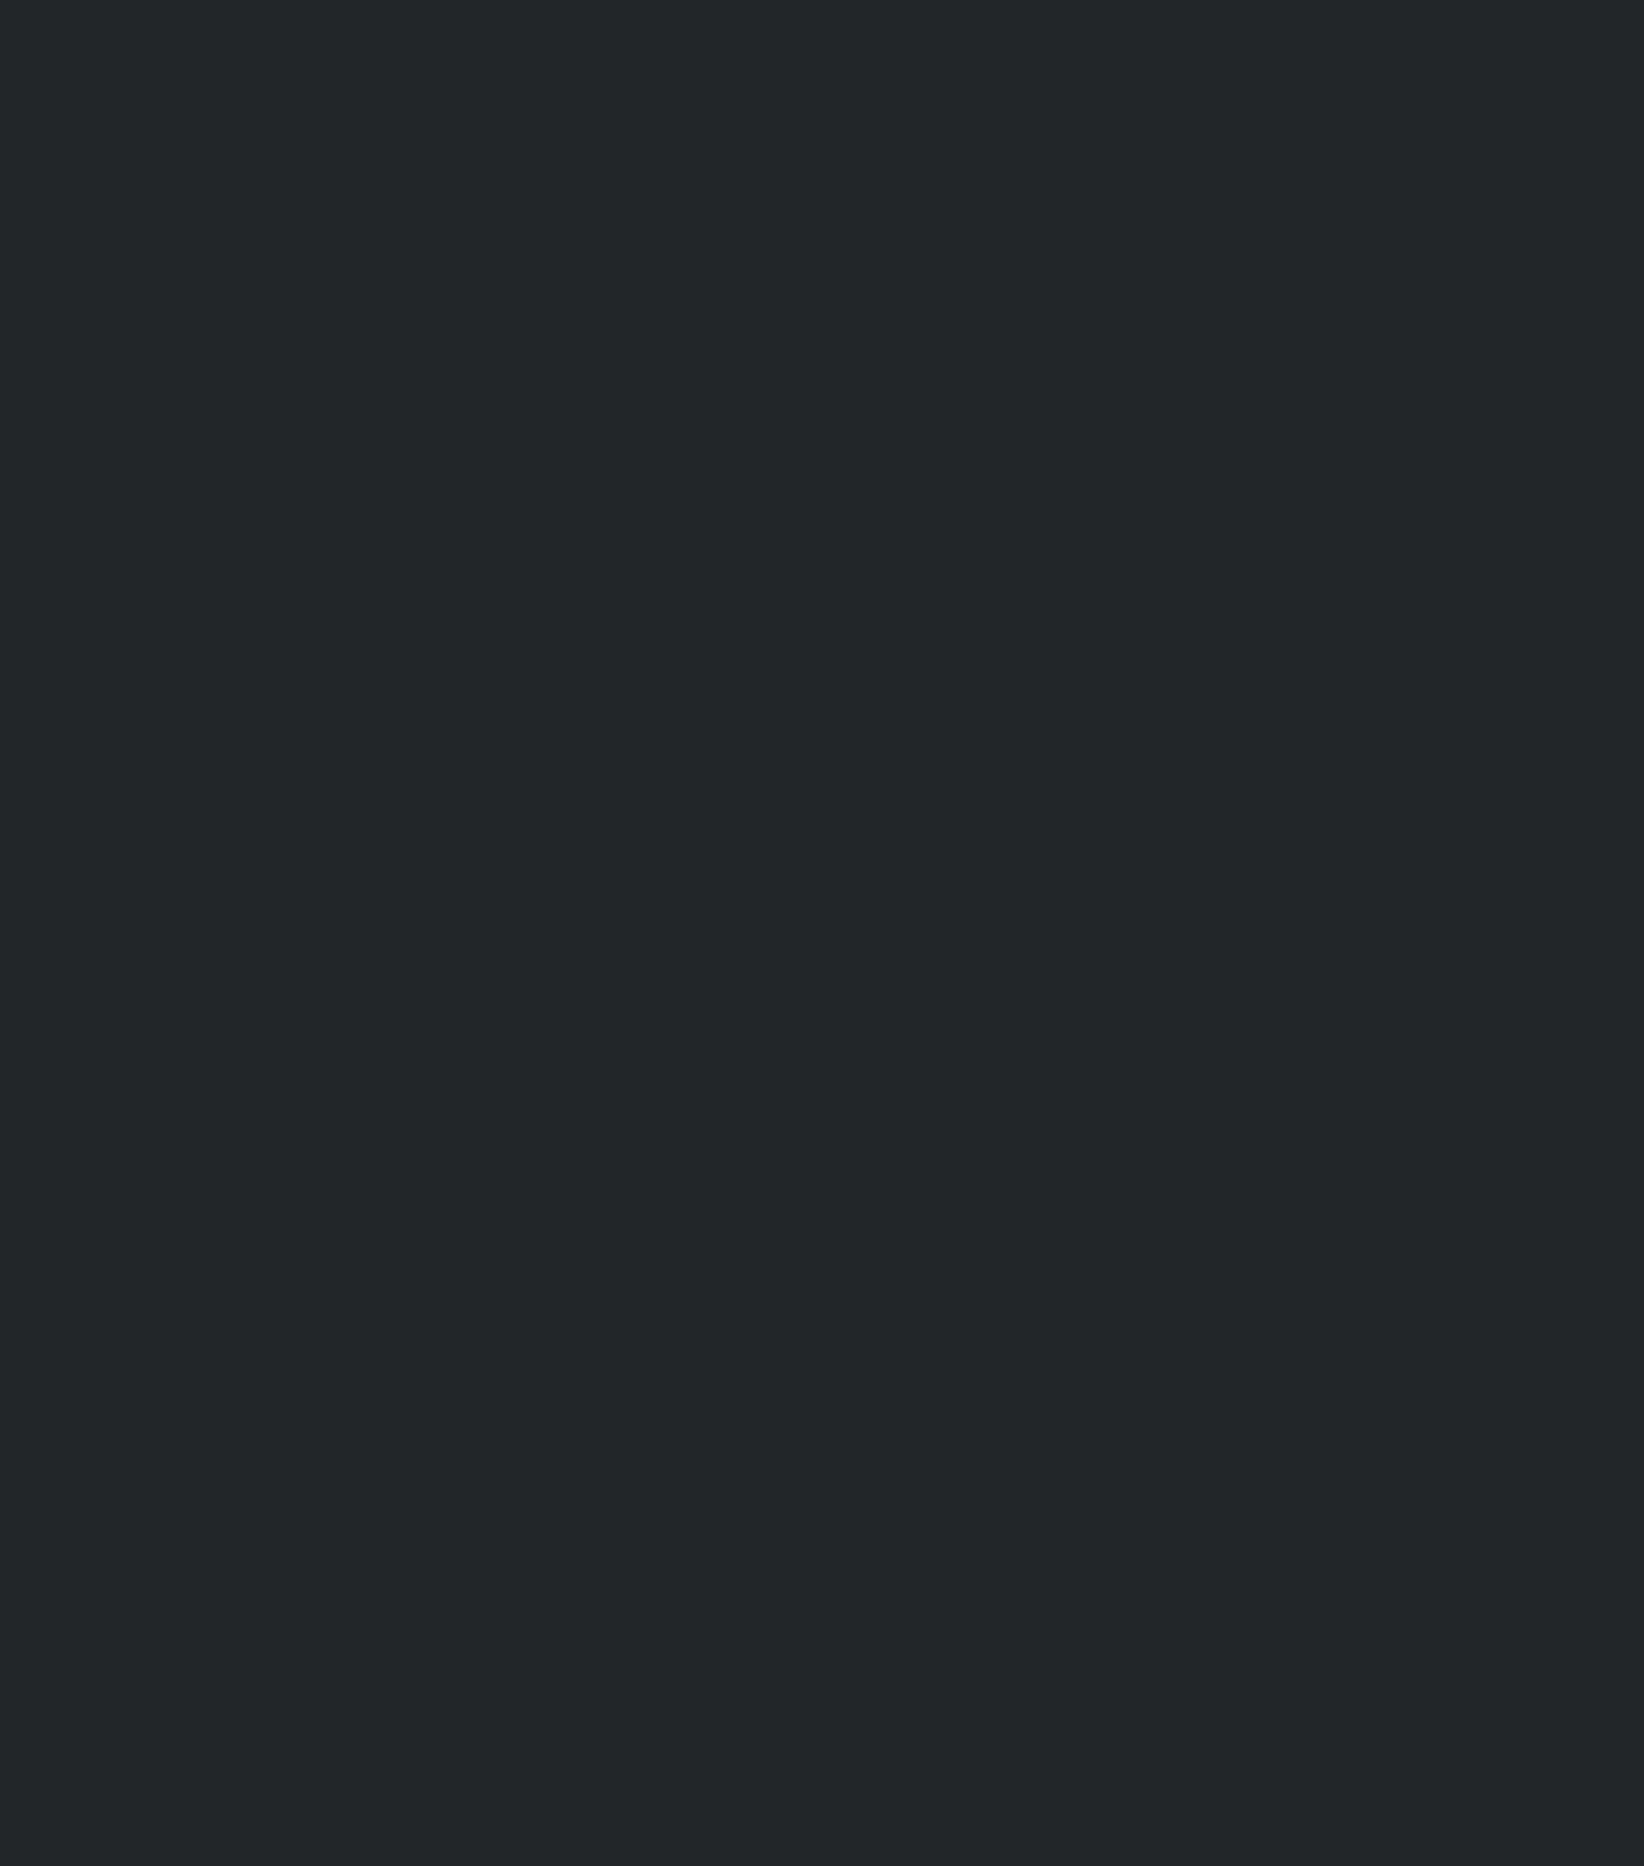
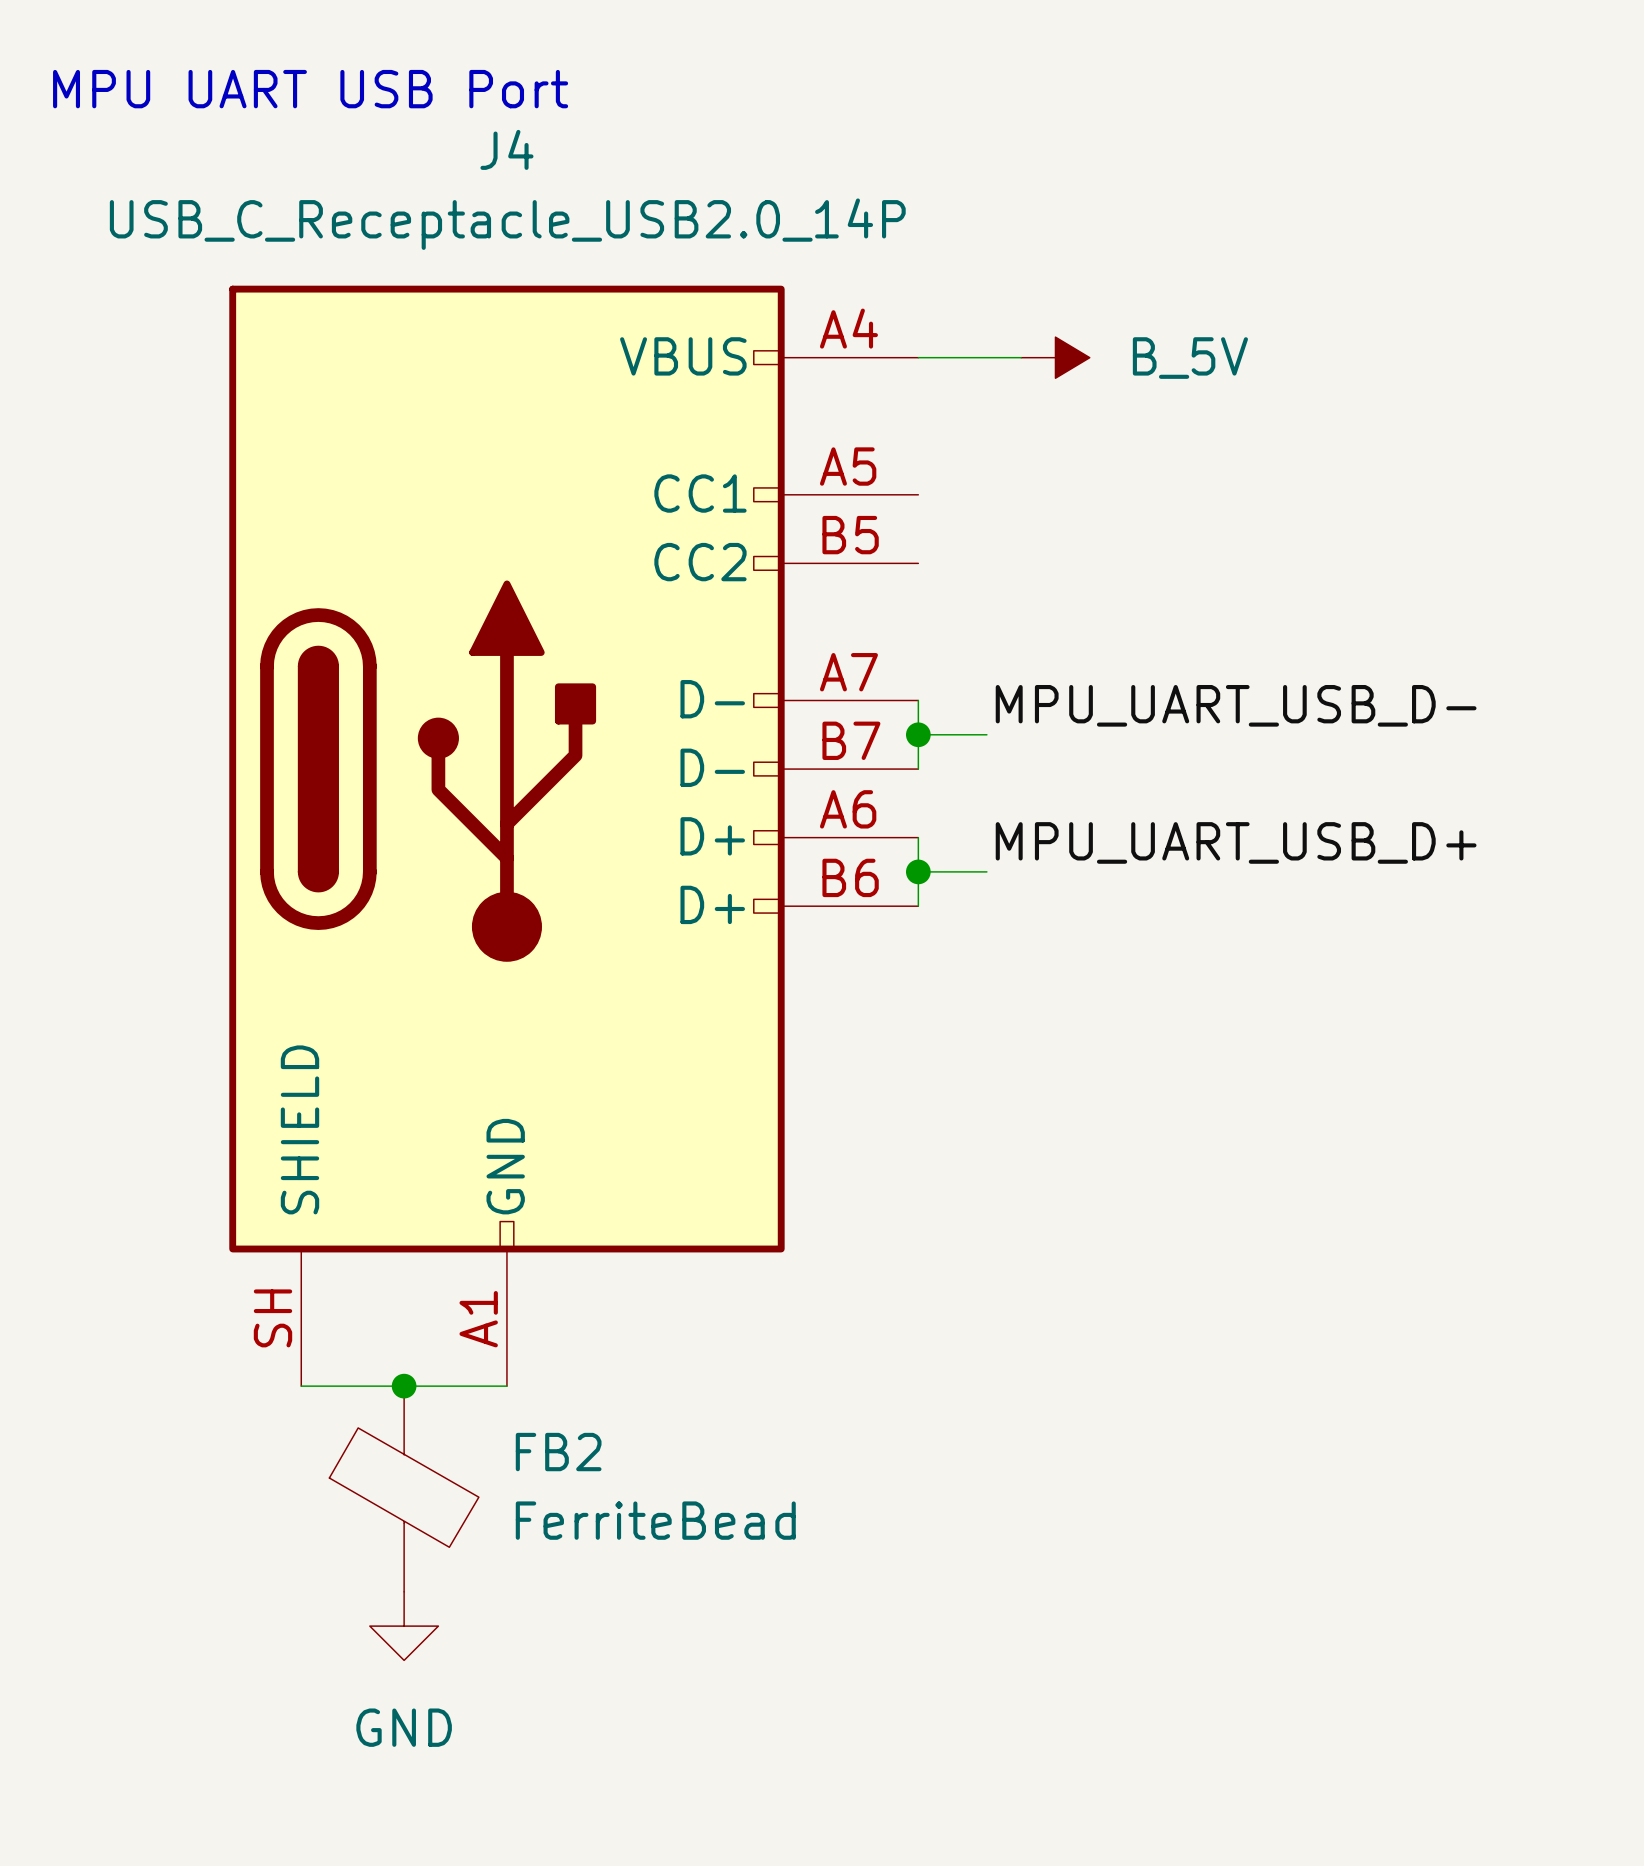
text: none -> MPU UART USB Port (310, 89)
wire: none -> (918, 357) (1021, 357)
power symbol: none -> B_5V (1055, 357)
wire: none -> (918, 700) (918, 769)
label: none -> MPU_UART_USB_D- (1236, 705)
wire: none -> (918, 734) (986, 734)
junction: none -> (918, 734)
J4: none -> USB_C_Receptacle_USB2.0_14P (573, 835)
wire: none -> (918, 837) (918, 906)
label: none -> MPU_UART_USB_D+ (1236, 842)
wire: none -> (918, 871) (986, 871)
junction: none -> (918, 871)
wire: none -> (301, 1386) (506, 1386)
junction: none -> (404, 1386)
FB2: none -> FerriteBead (404, 1488)
power symbol: none -> GND (404, 1626)

